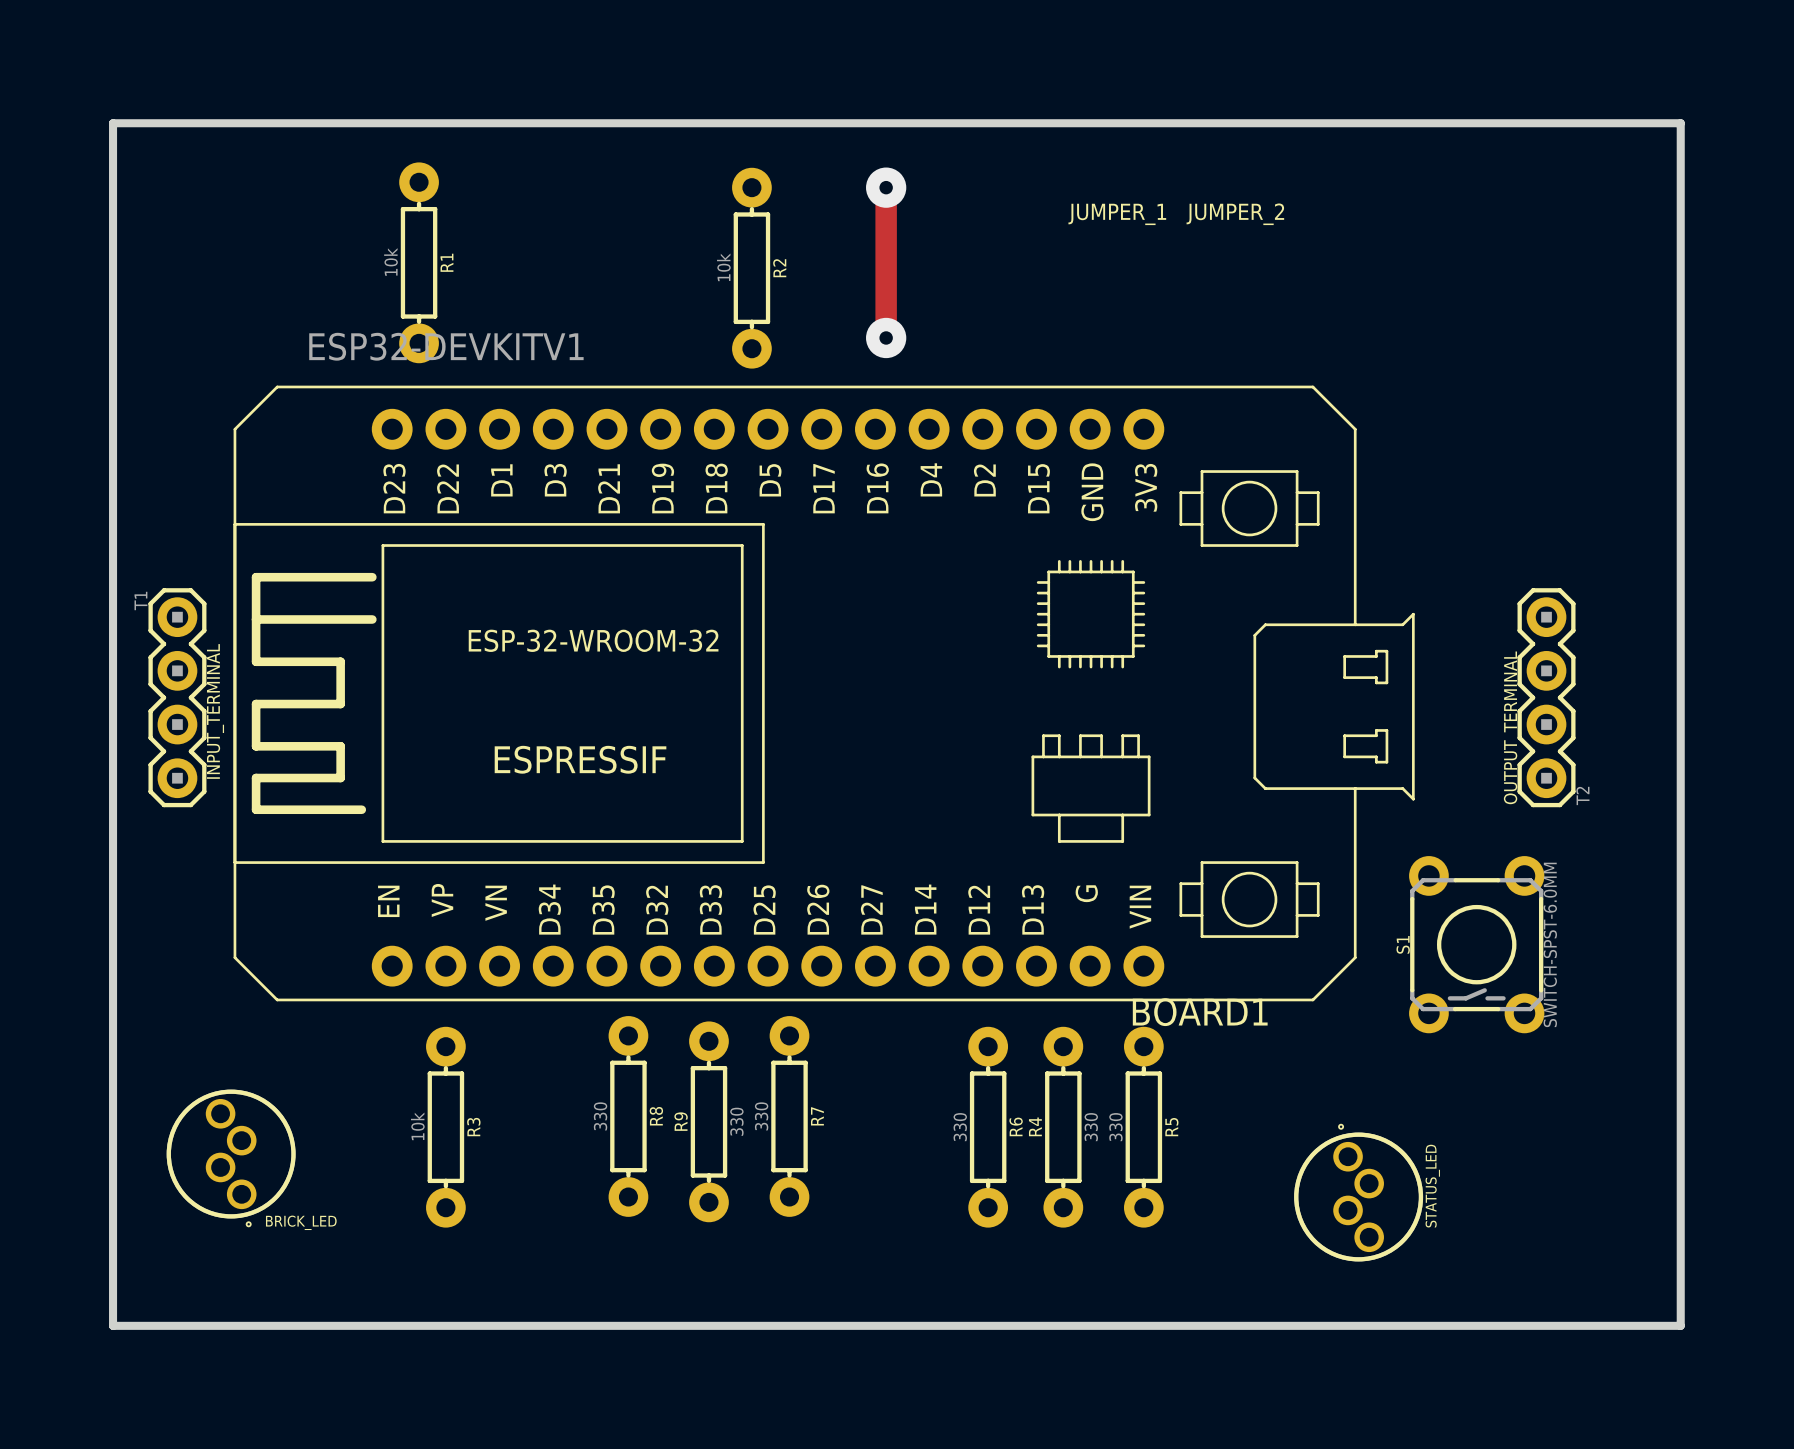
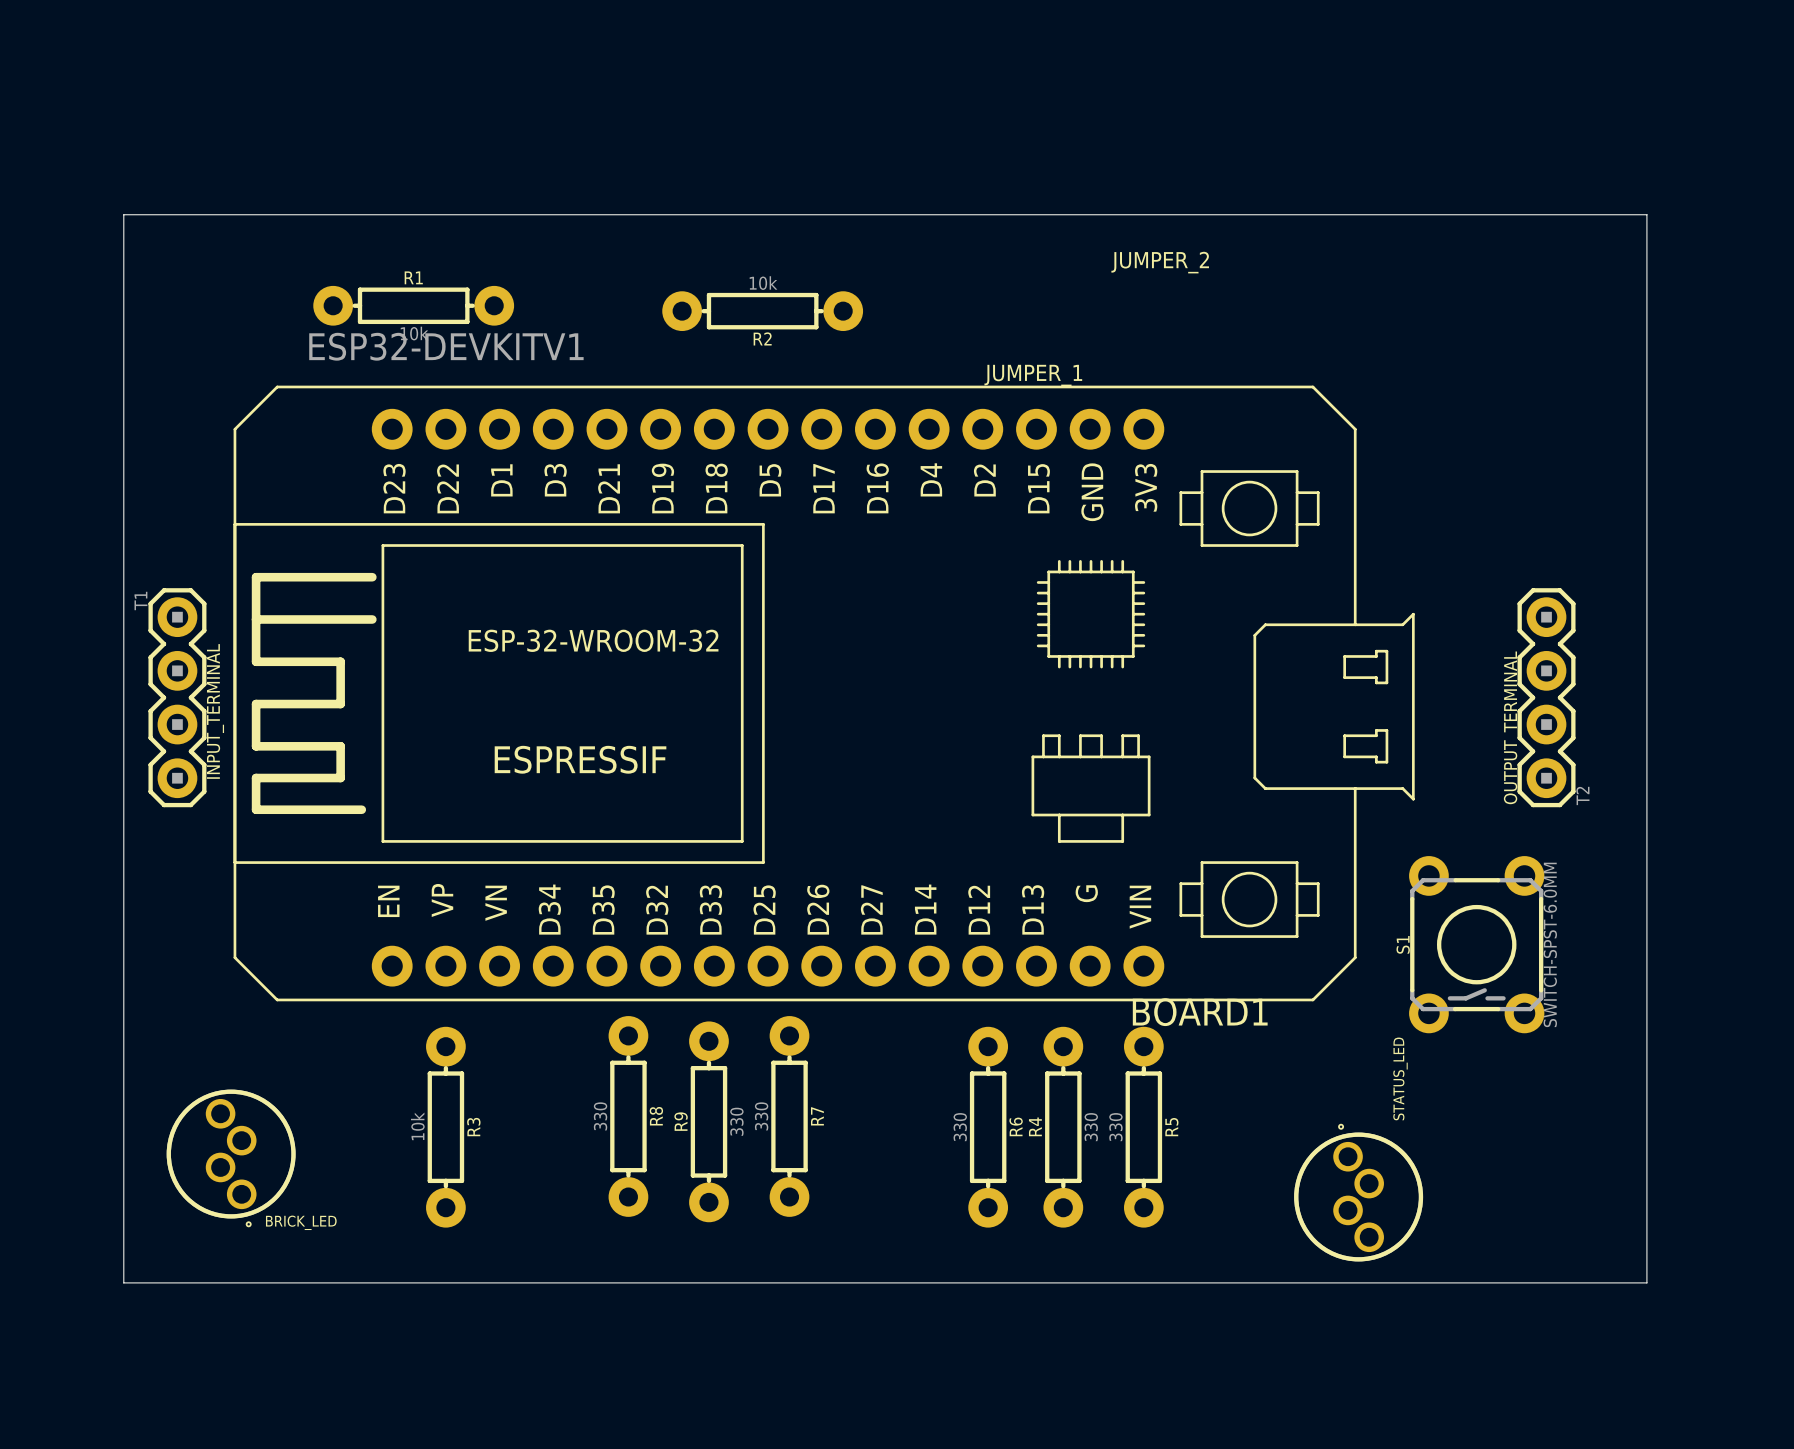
board edge: (113, 123) (113, 1325) (1680, 1325) (1680, 123) (113, 123) -> (123, 214) (123, 1282) (1646, 1282) (1646, 214) (123, 214)
track: (886, 187) (886, 337) -> none
via: (886, 187) -> none
JUMPER_1 position: (1117, 214) -> (1033, 375)
JUMPER_2 position: (1235, 214) -> (1160, 262)
R1 rotation: 0° (419, 262) -> 90° clockwise (413, 305)
R2 rotation: 0° (751, 268) -> 90° clockwise (762, 311)
via: (886, 337) -> none
STATUS_LED name position: STATUS_LED (1432, 1186) -> STATUS_LED (1400, 1078)

